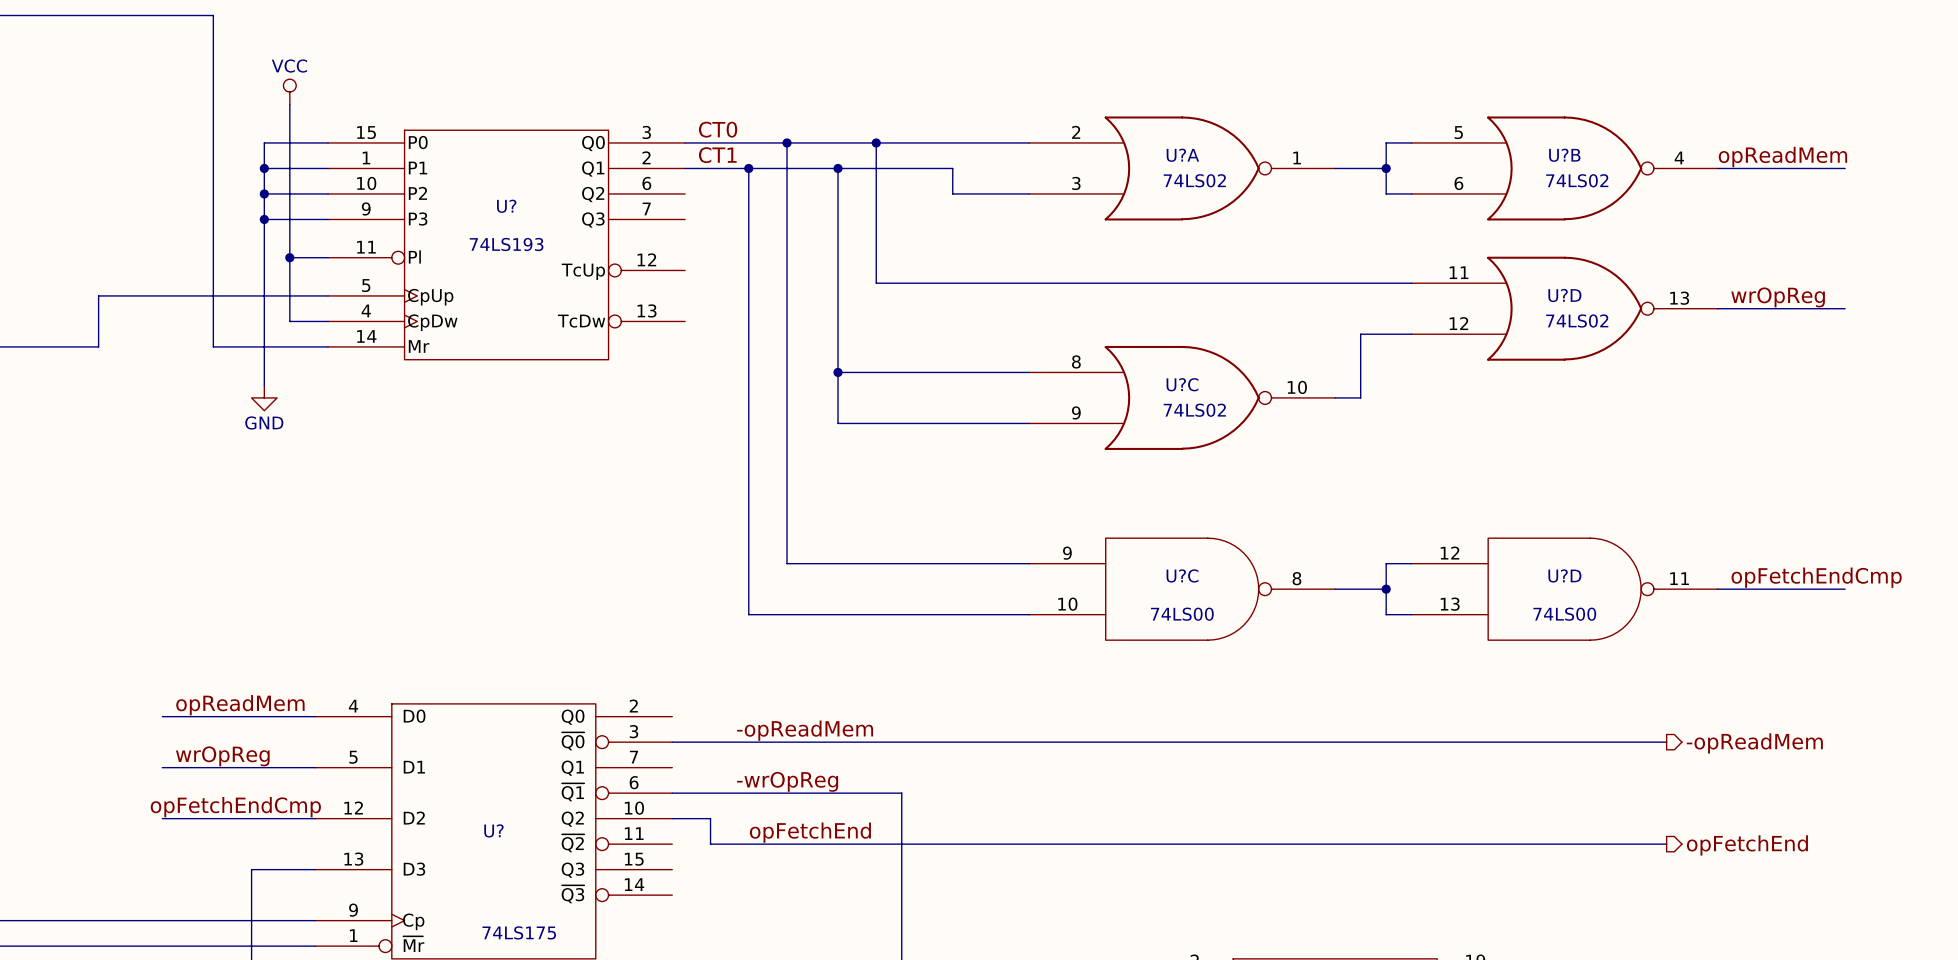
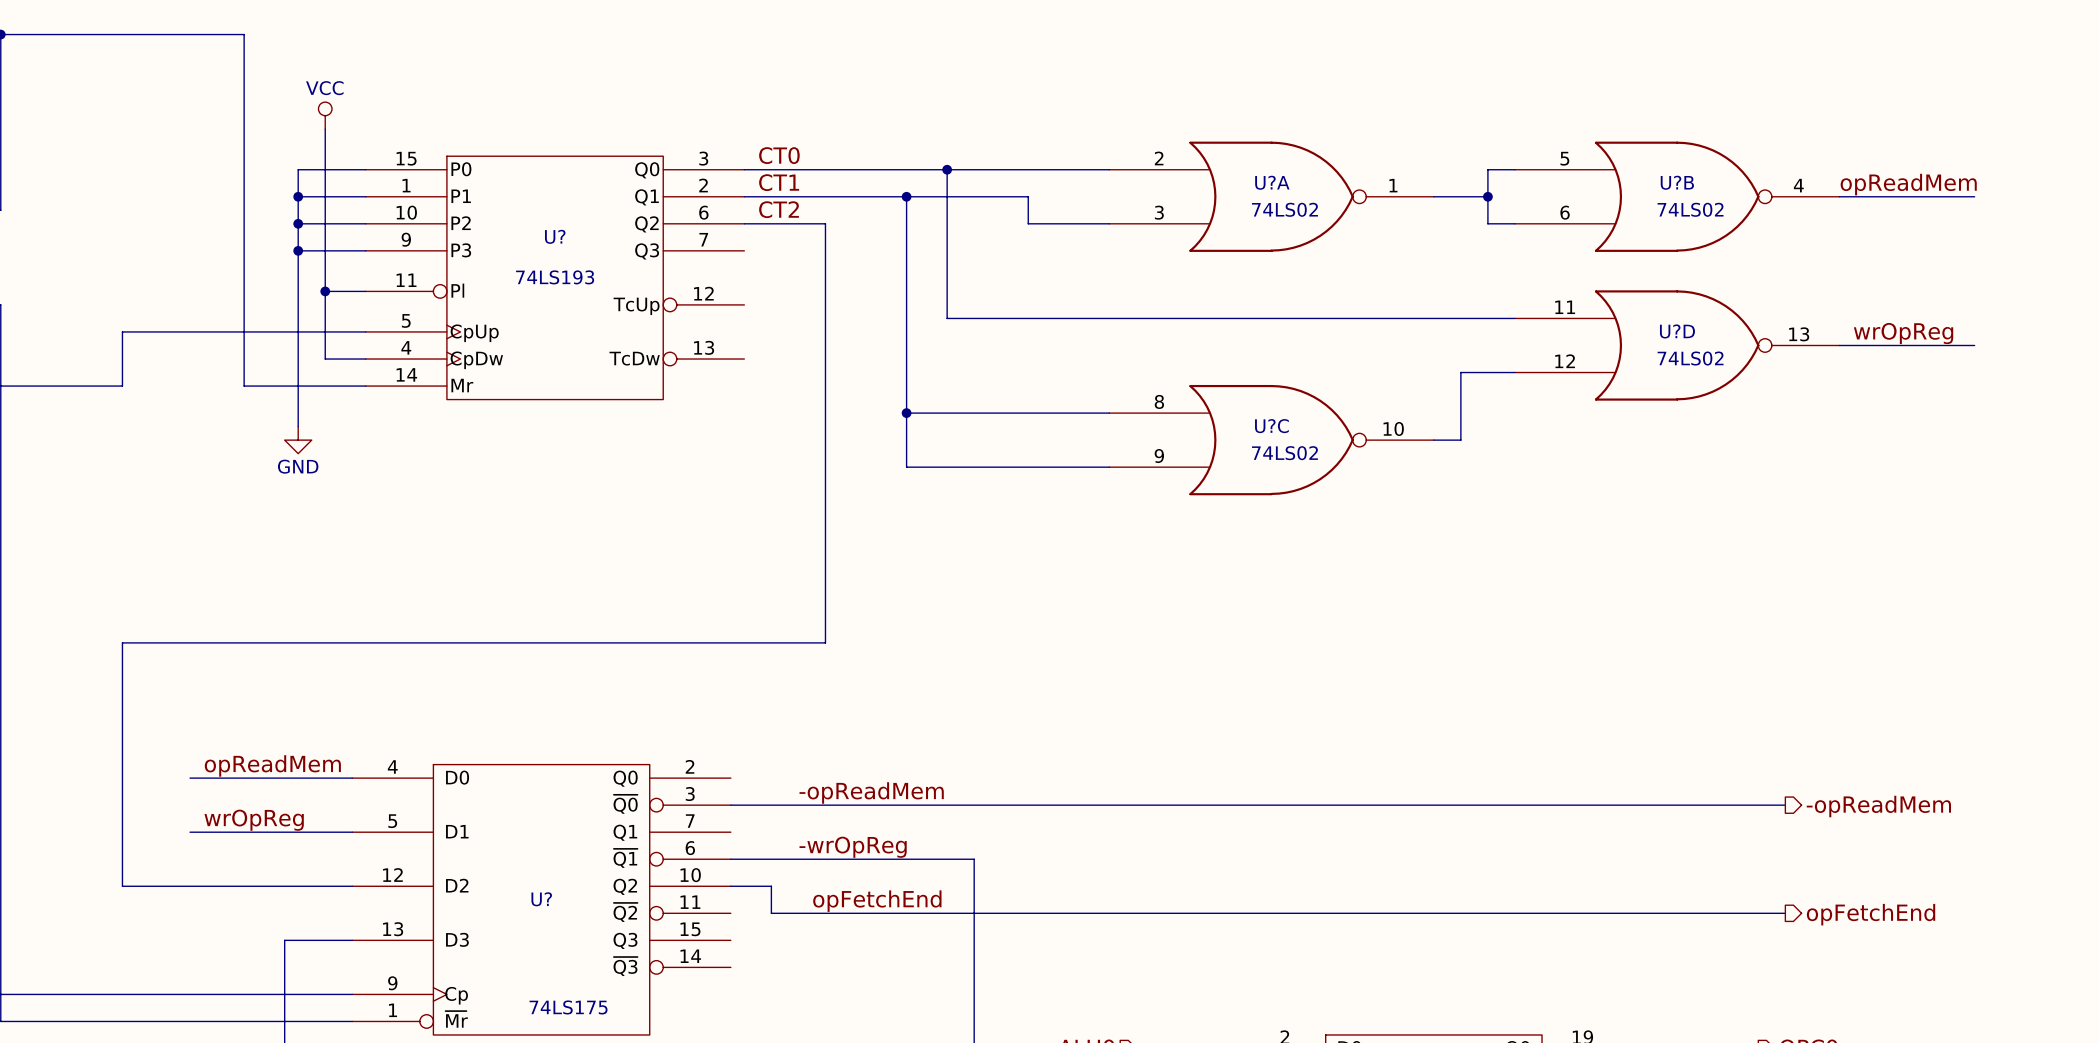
wire: (787, 142) (787, 563) (1029, 563) -> none
junction: (787, 142) -> none
wire: (748, 168) (748, 614) (1029, 614) -> none
junction: (748, 168) -> none
label: none -> CT2 (779, 209)
wire: none -> (744, 223) (825, 223) (825, 642) (122, 642) (122, 886) (190, 886)
wire: (1411, 563) (1386, 563) (1386, 614) (1411, 614) -> none
label: opFetchEndCmp (1816, 577) -> none
U?C: 74LS00 (1182, 589) -> none
wire: (1335, 589) (1386, 589) -> none
junction: (1386, 589) -> none
U?D: 74LS00 (1564, 589) -> none
wire: (1717, 589) (1845, 589) -> none
label: opFetchEndCmp (235, 807) -> none

